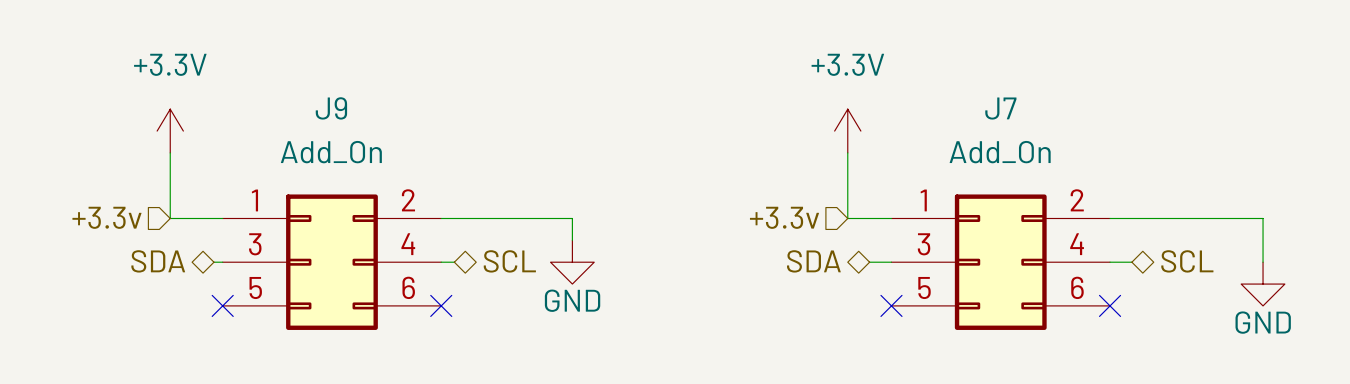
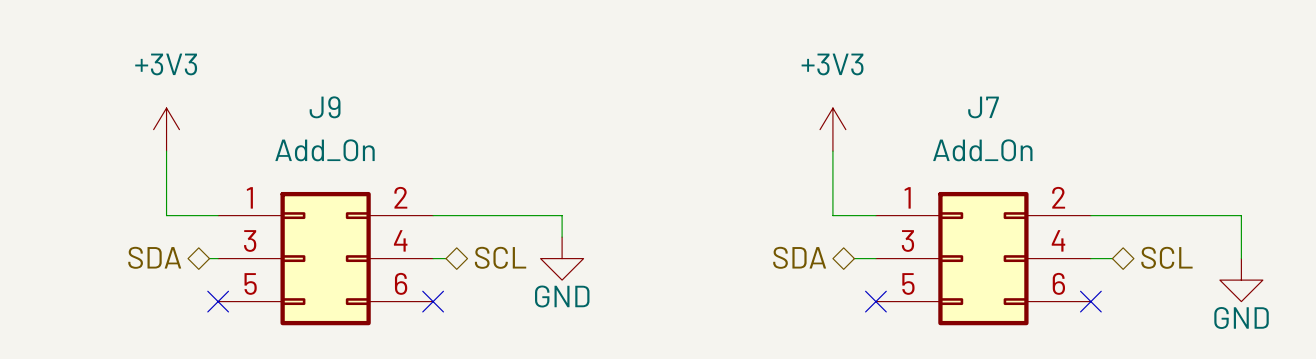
power symbol: +3.3V (170, 131) -> +3V3 (166, 129)
power symbol: +3.3V (847, 131) -> +3V3 (832, 129)
hierarchical label: +3.3v (107, 217) -> none
hierarchical label: +3.3v (784, 217) -> none

